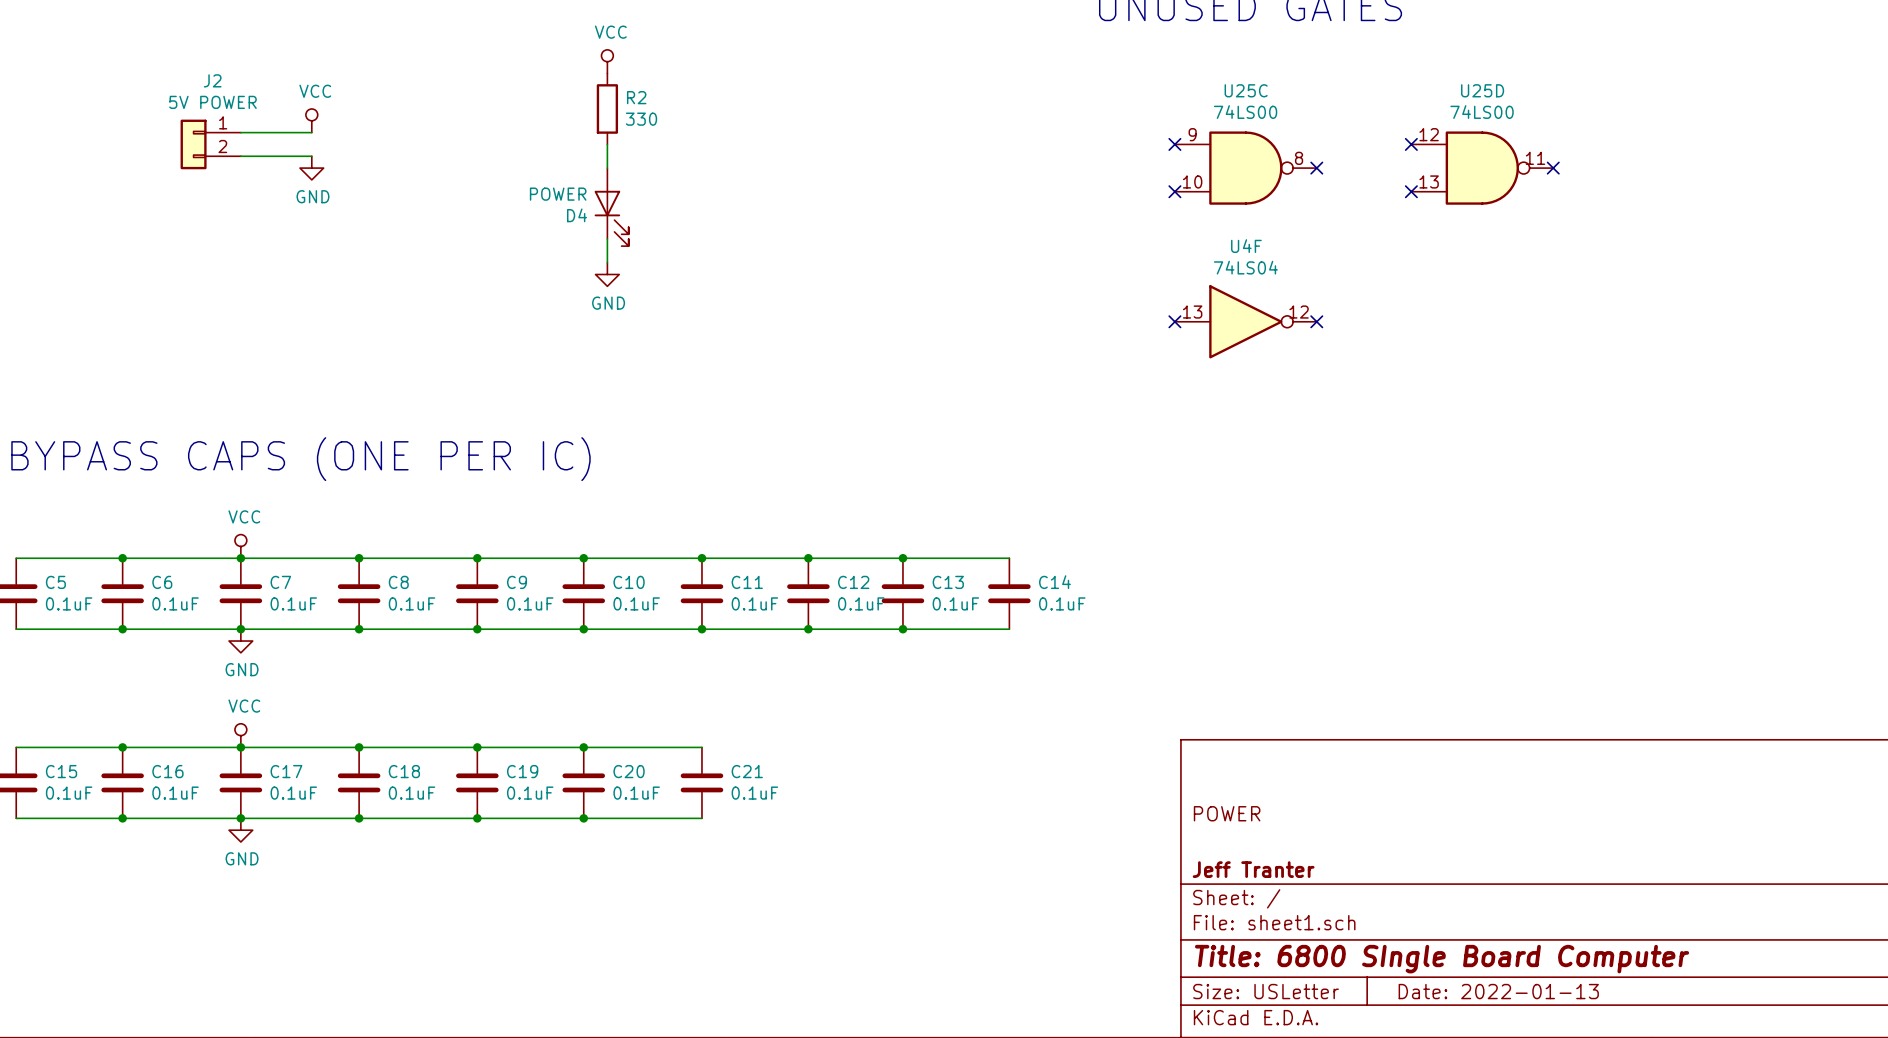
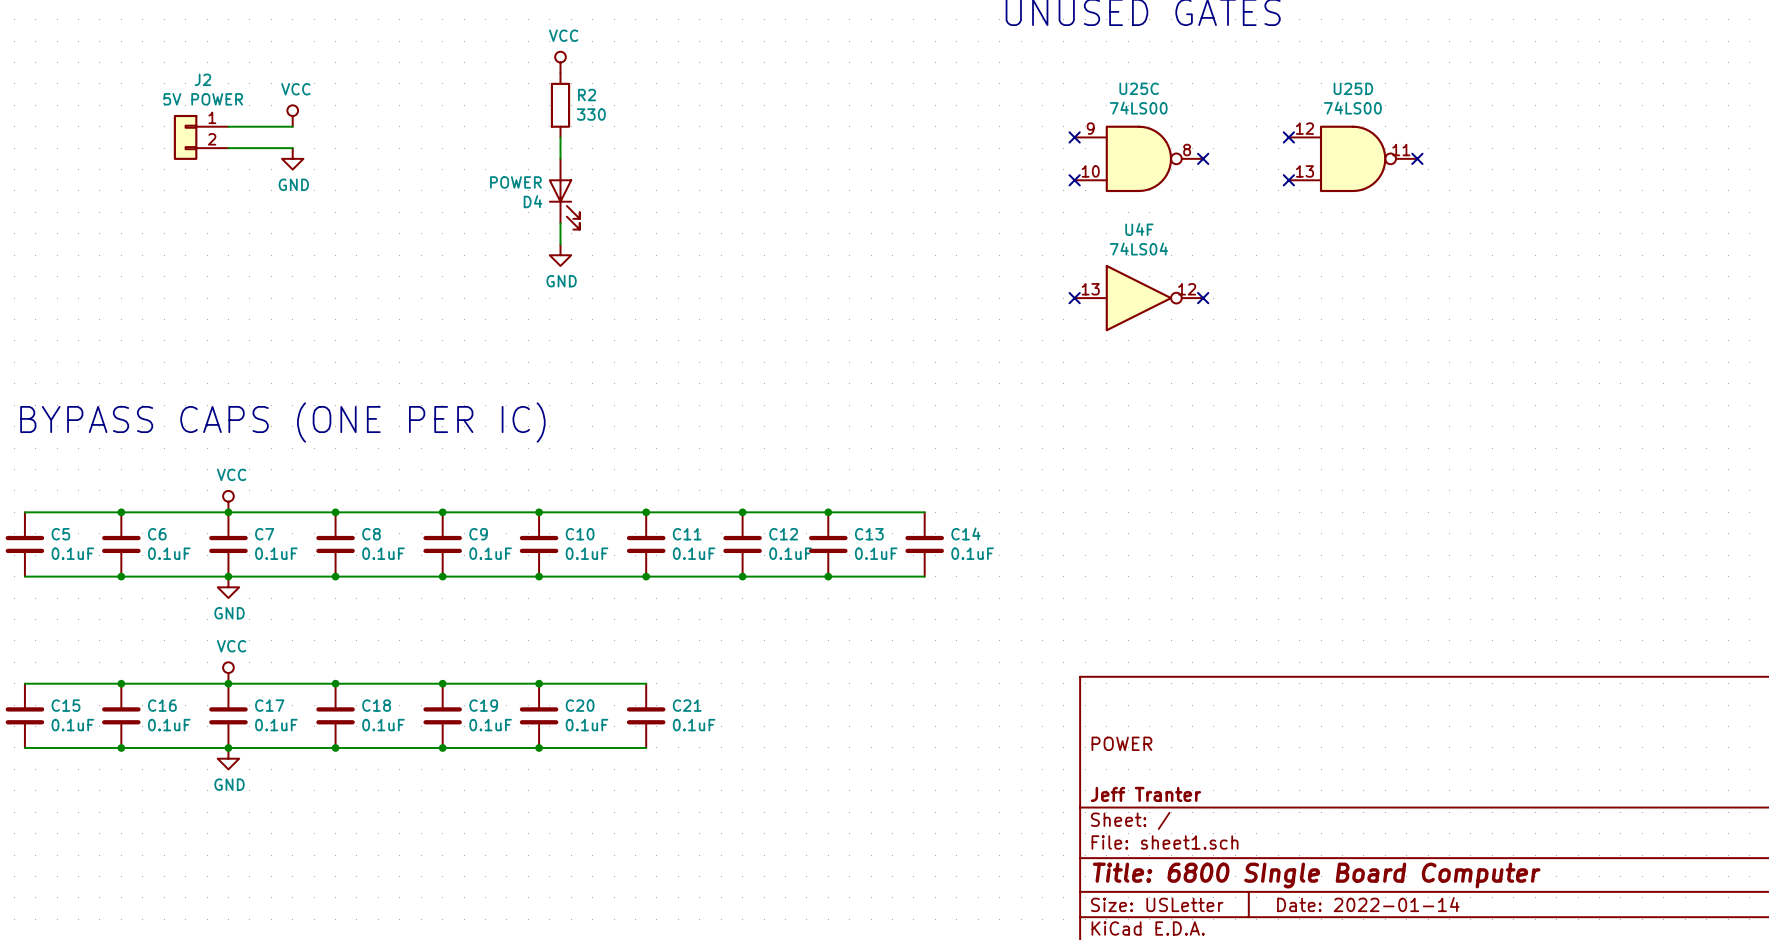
title block: Date: 2022-01-13 (1498, 991) -> Date: 2022-01-14 (1368, 904)

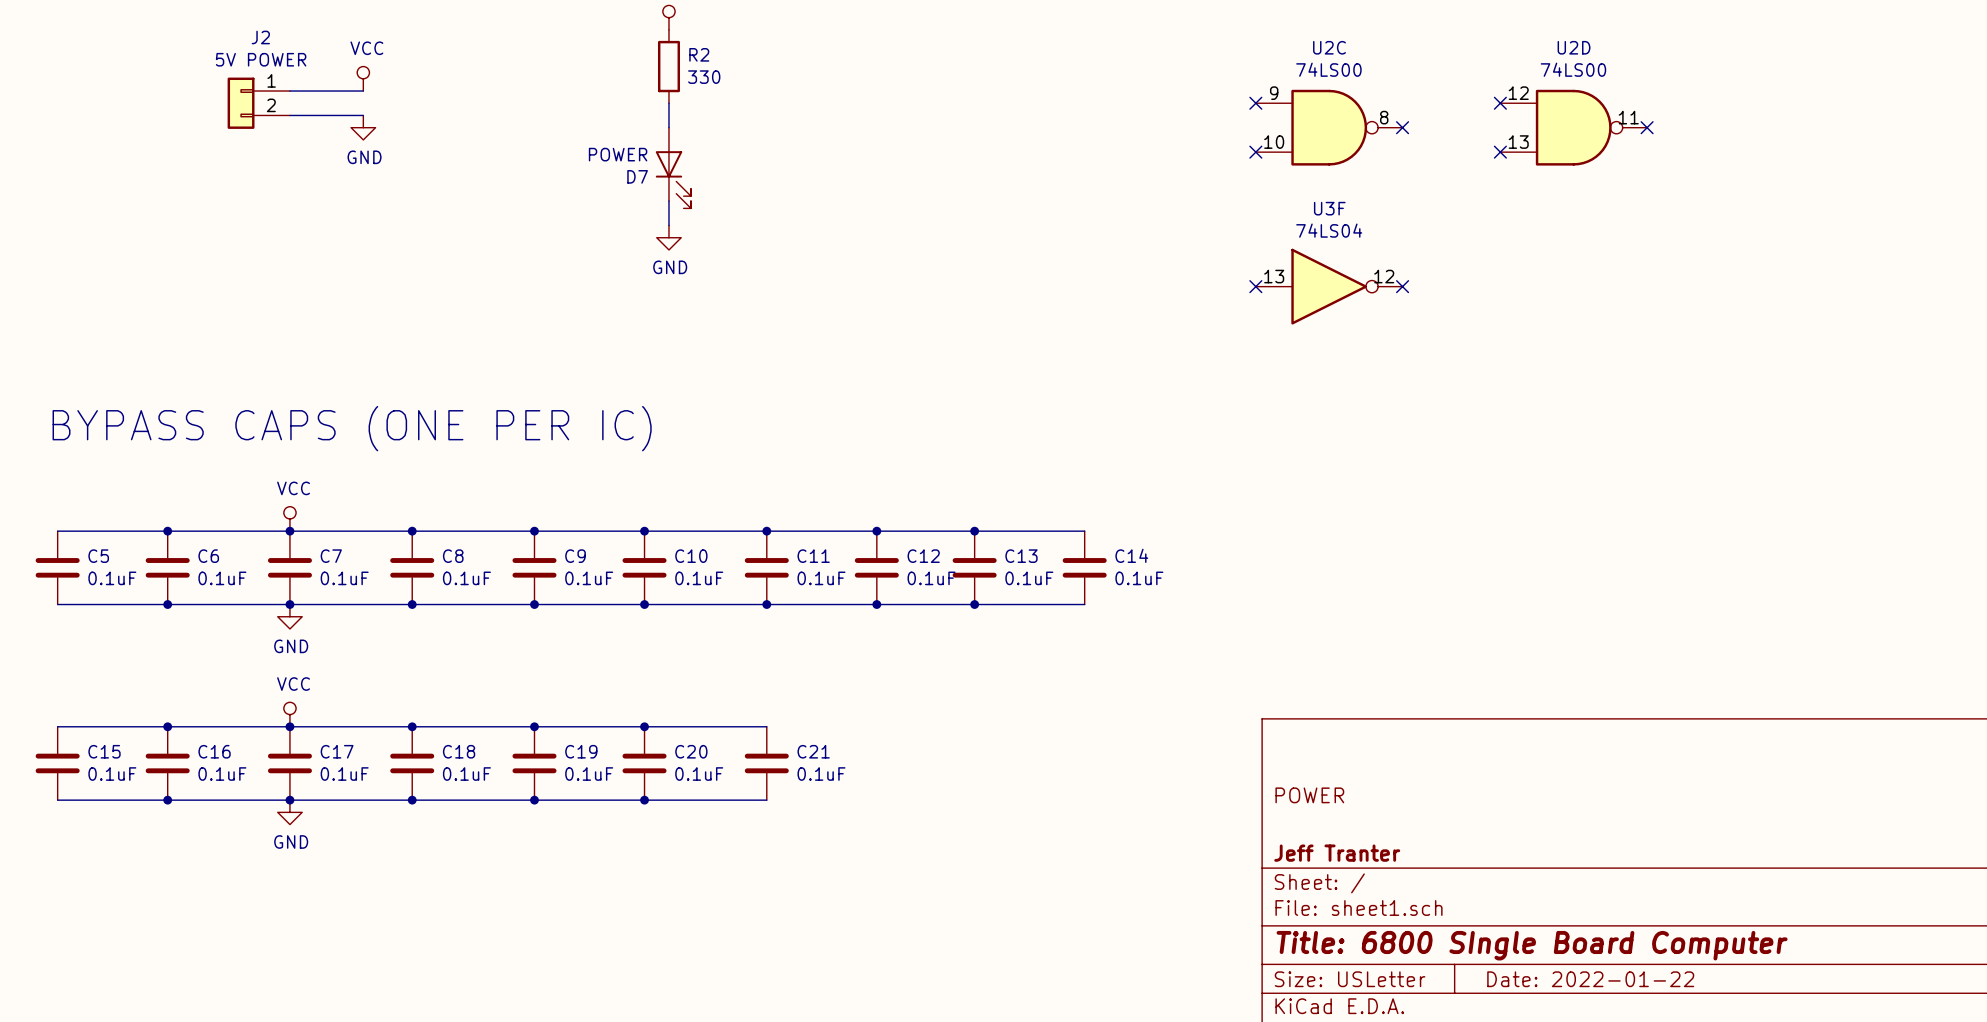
U25C name: U25C (1139, 88) -> U2C (1329, 47)
U25D name: U25D (1353, 88) -> U2D (1574, 47)
D4 name: D4 (533, 201) -> D7 (637, 176)
U4F name: U4F (1139, 229) -> U3F (1329, 208)
title block: Date: 2022-01-14 (1368, 904) -> Date: 2022-01-22 (1590, 979)

